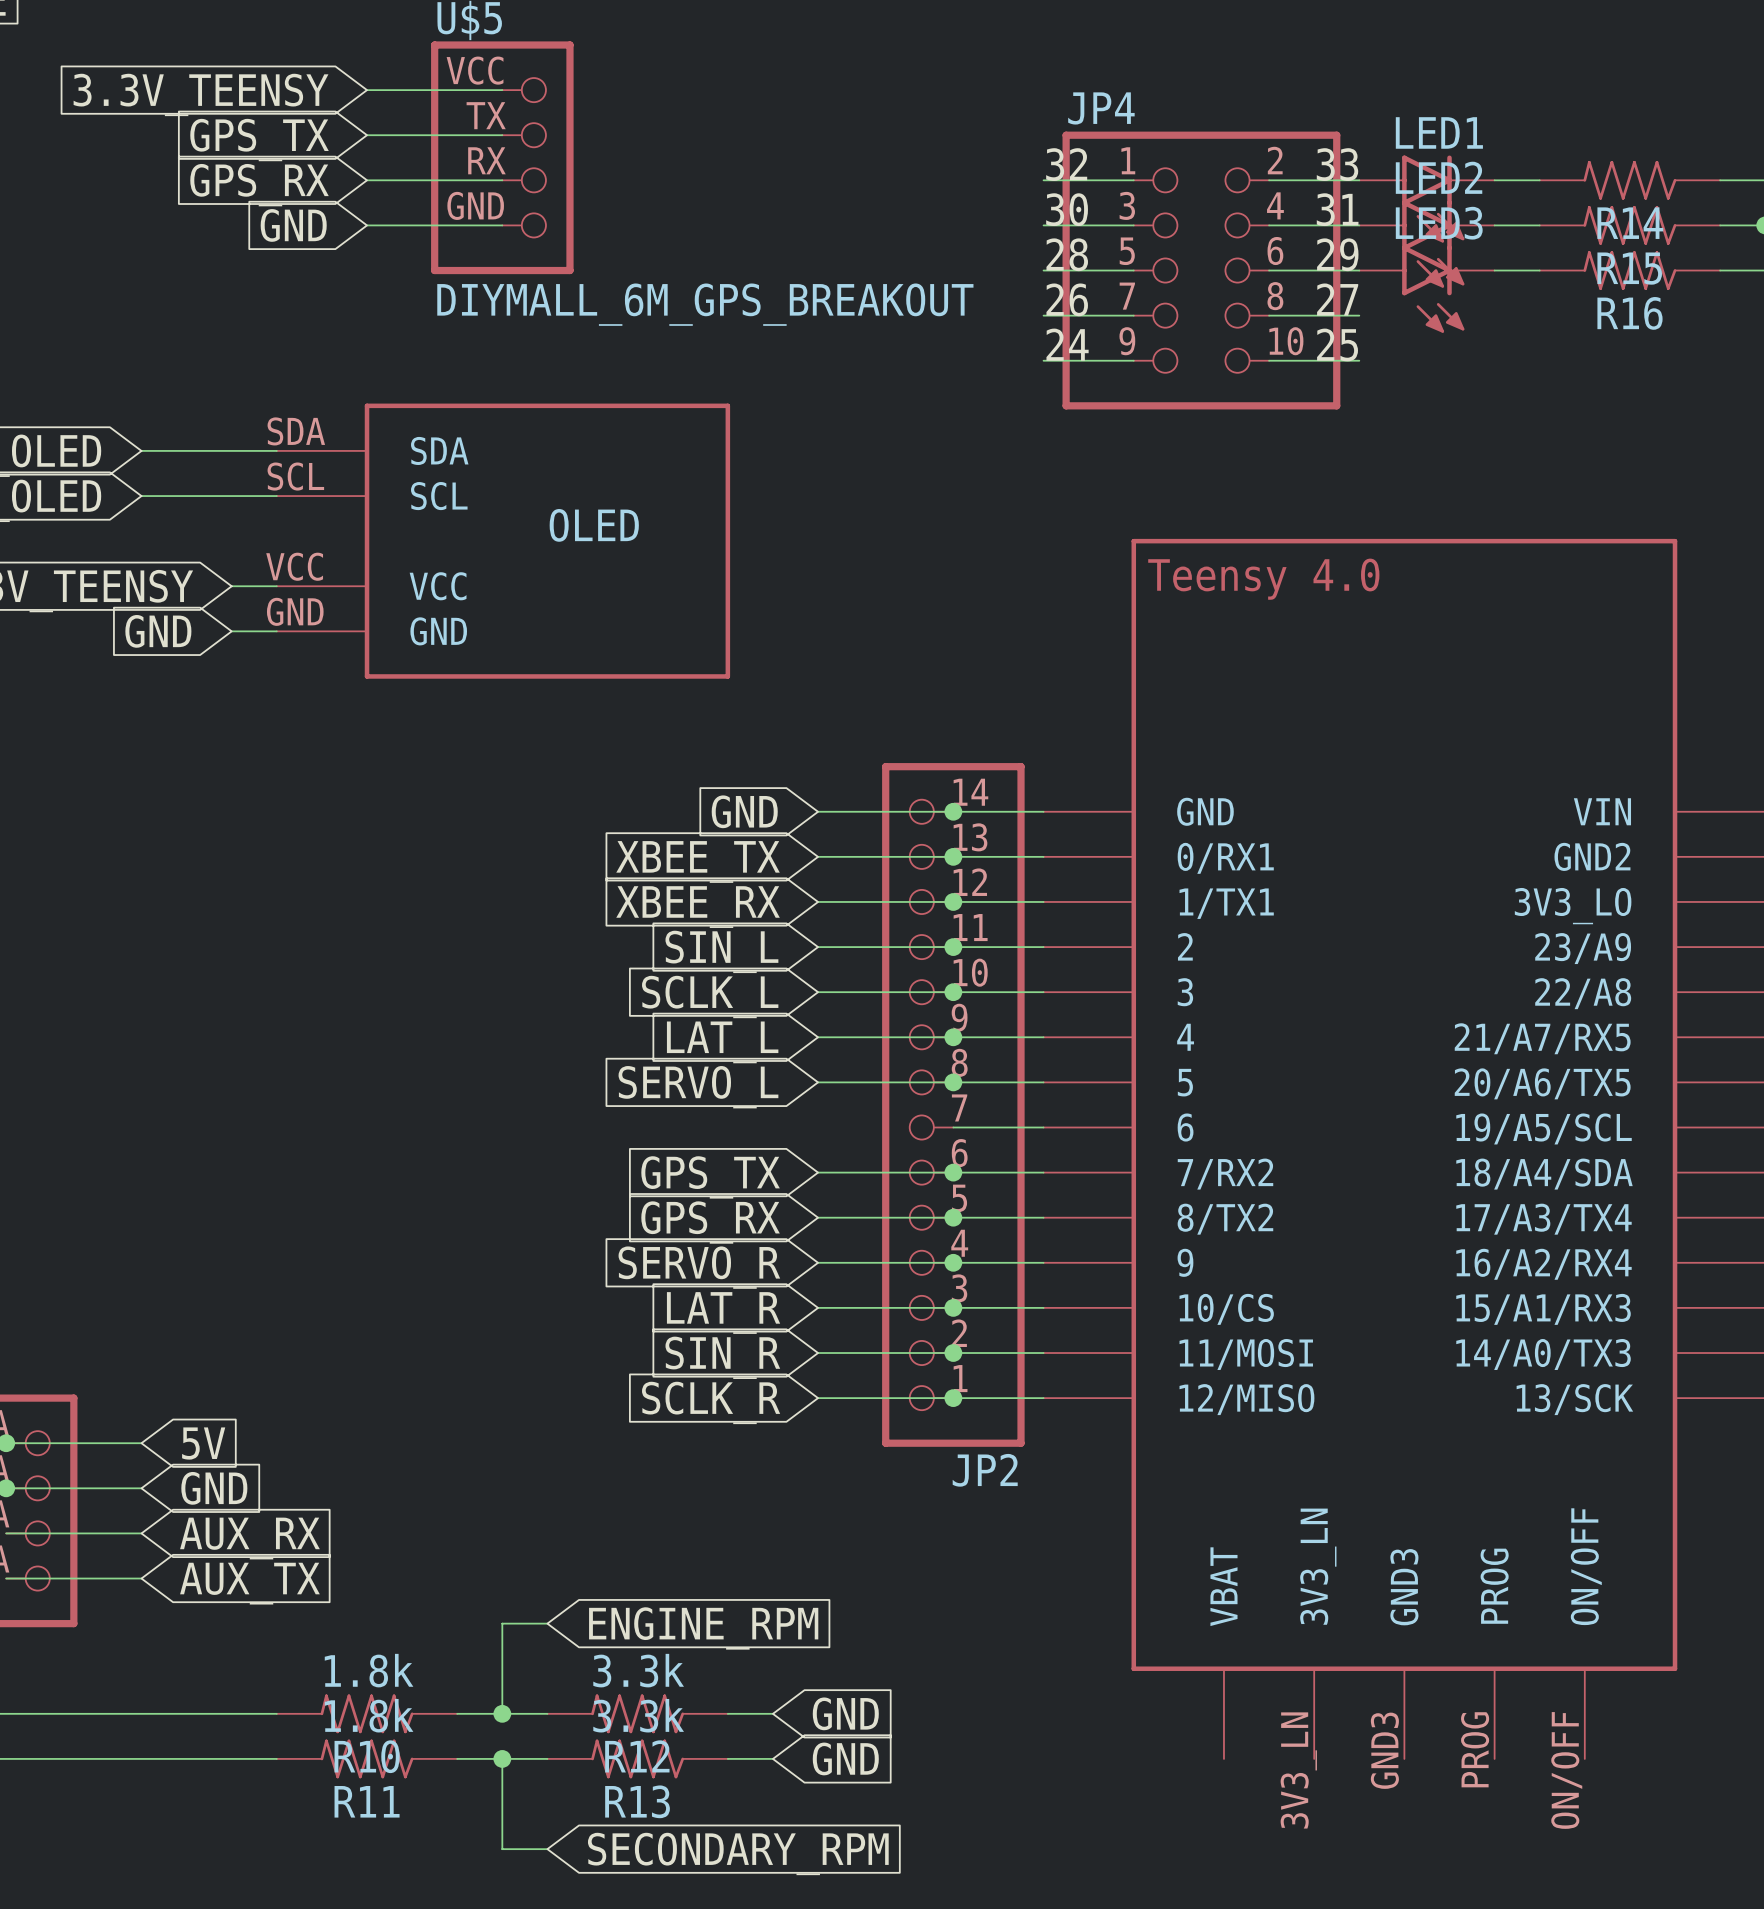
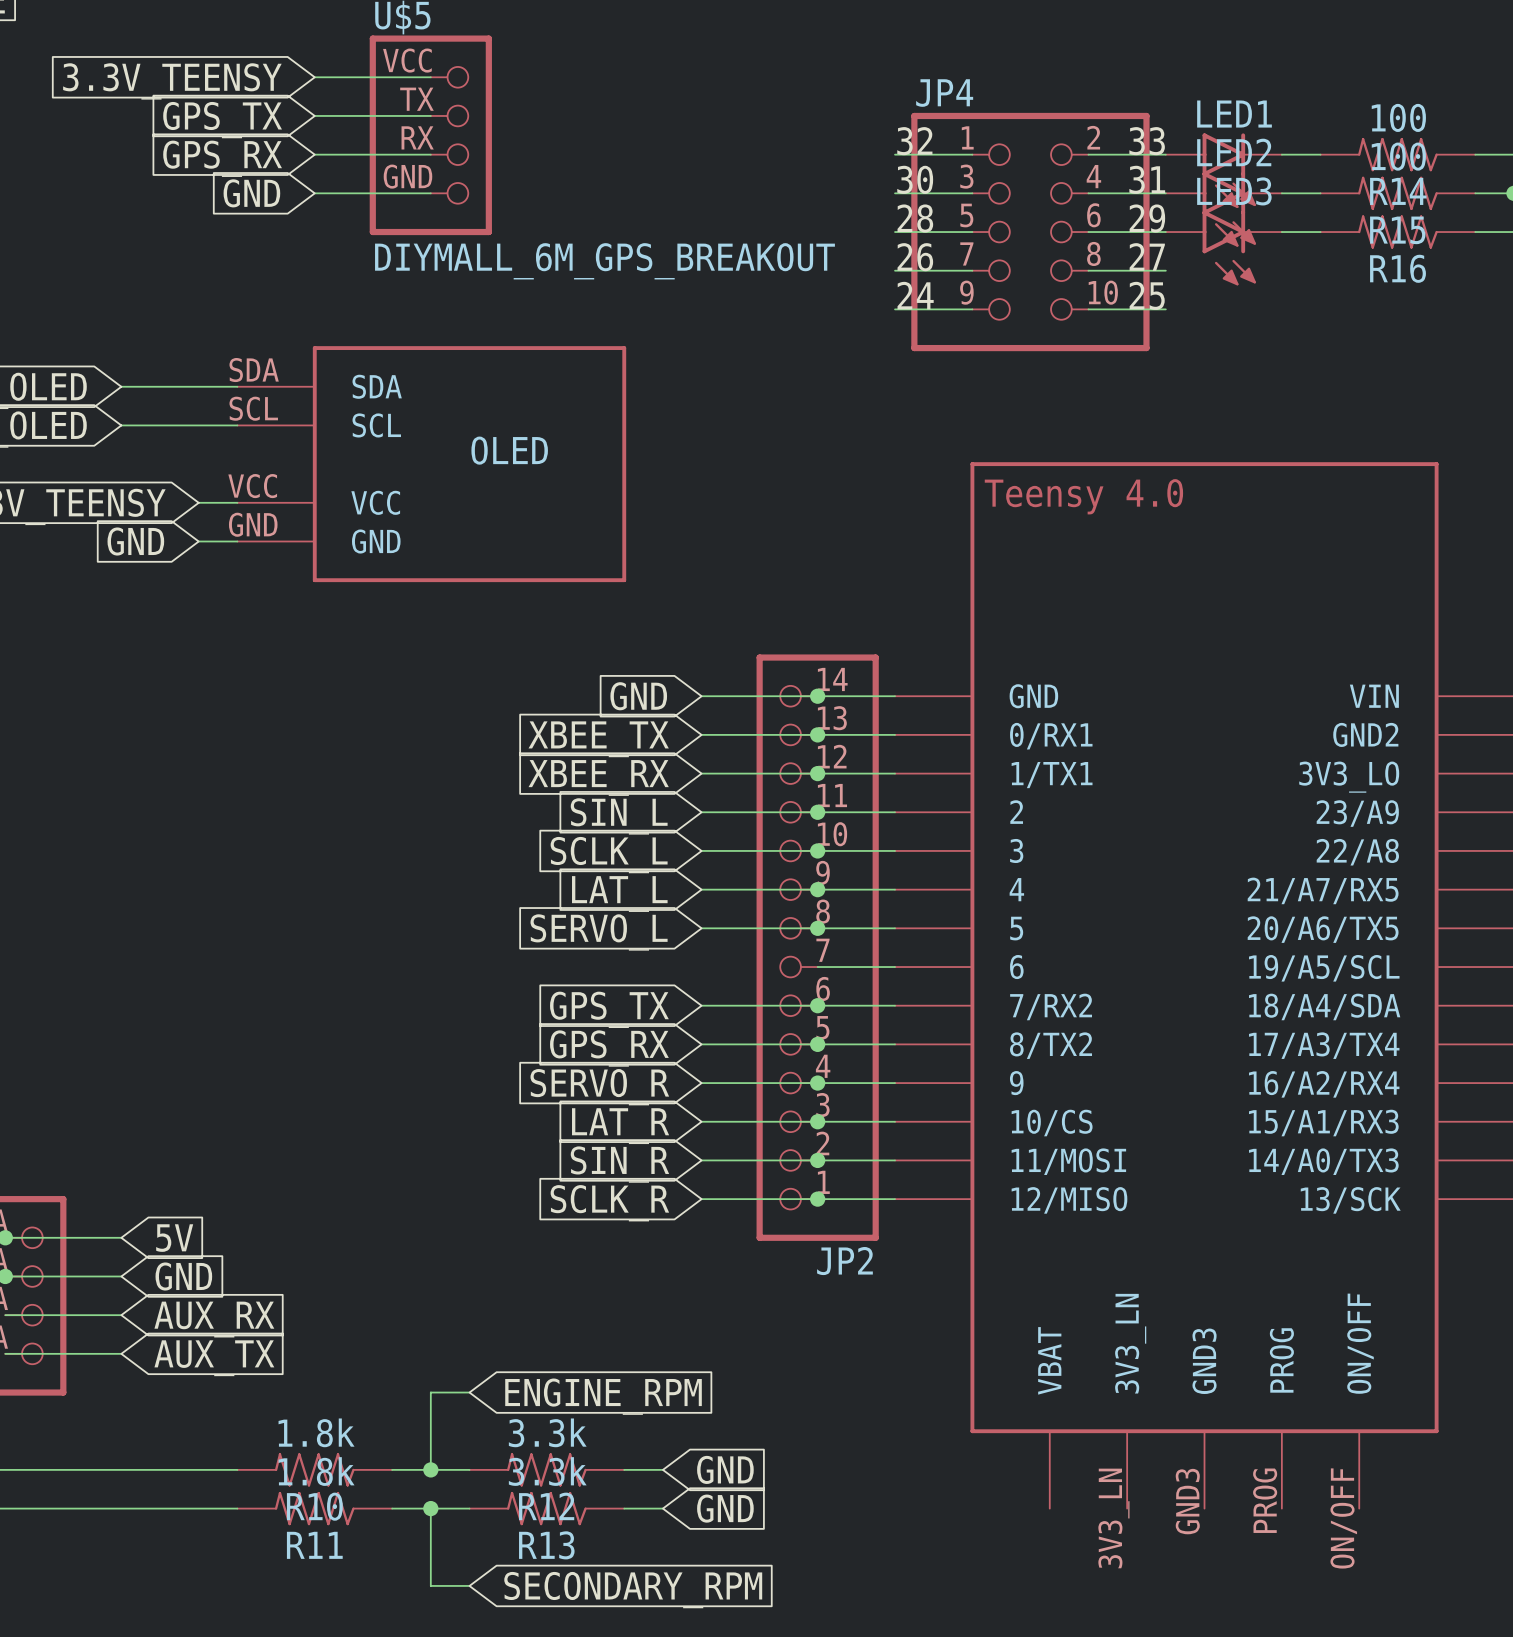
R14 value: none -> 100 (1398, 117)
R15 value: none -> 100 (1398, 156)

